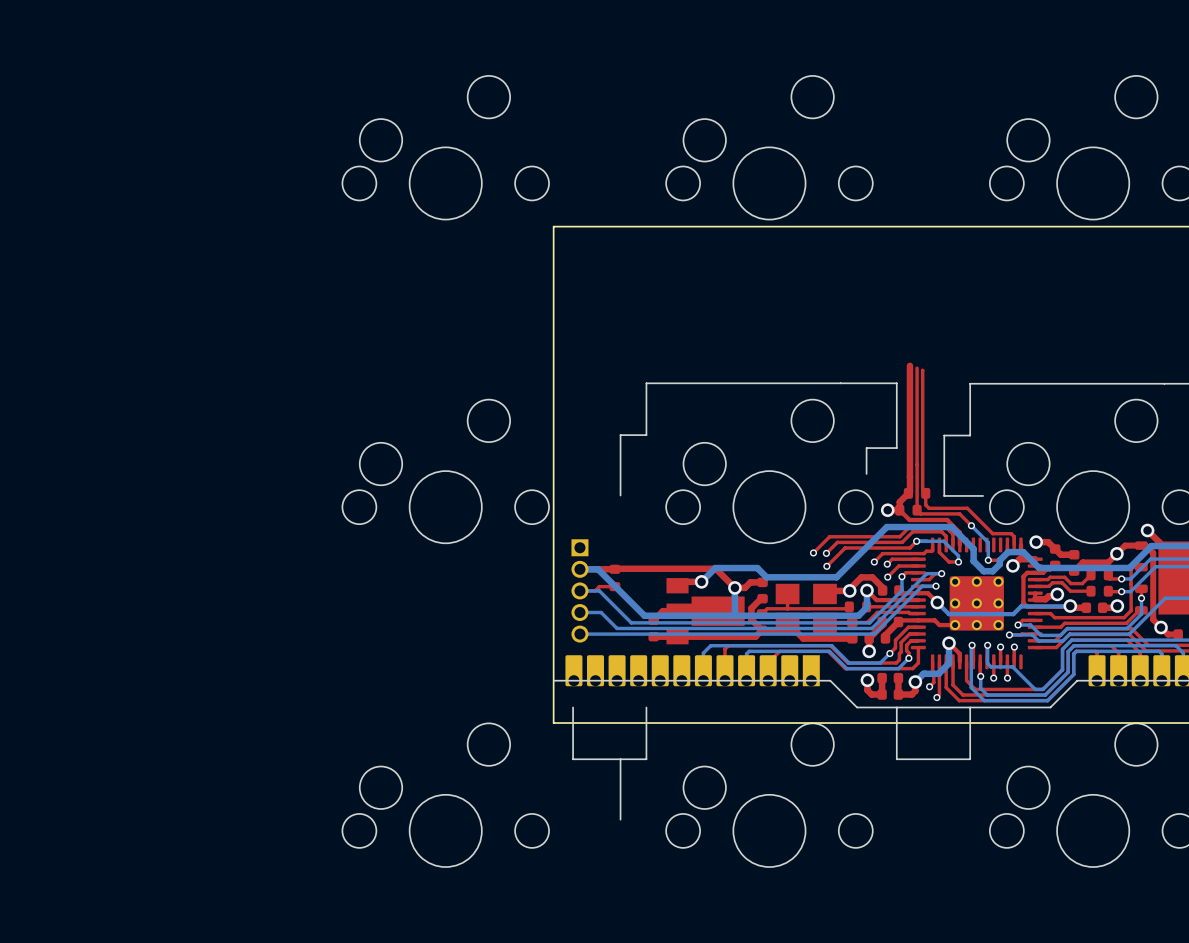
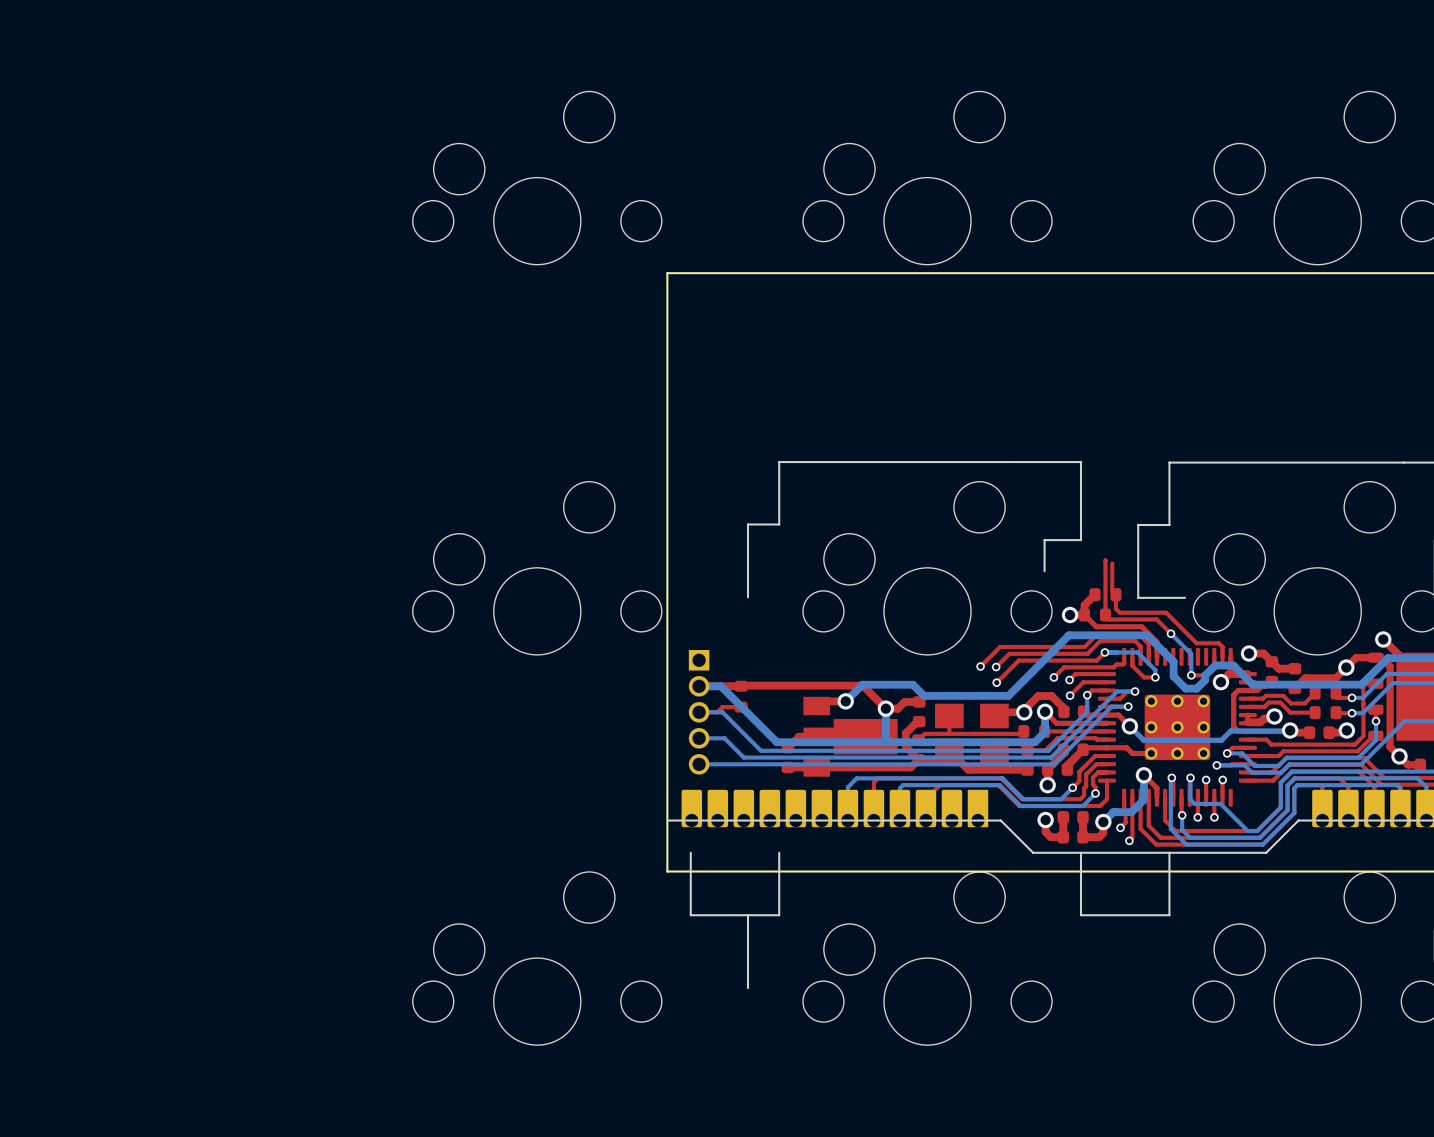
top track: (909, 365) (909, 476) -> none
top track: (917, 368) (917, 464) -> none
top track: (922, 370) (922, 467) -> none
top track: (909, 476) (908, 493) -> none

